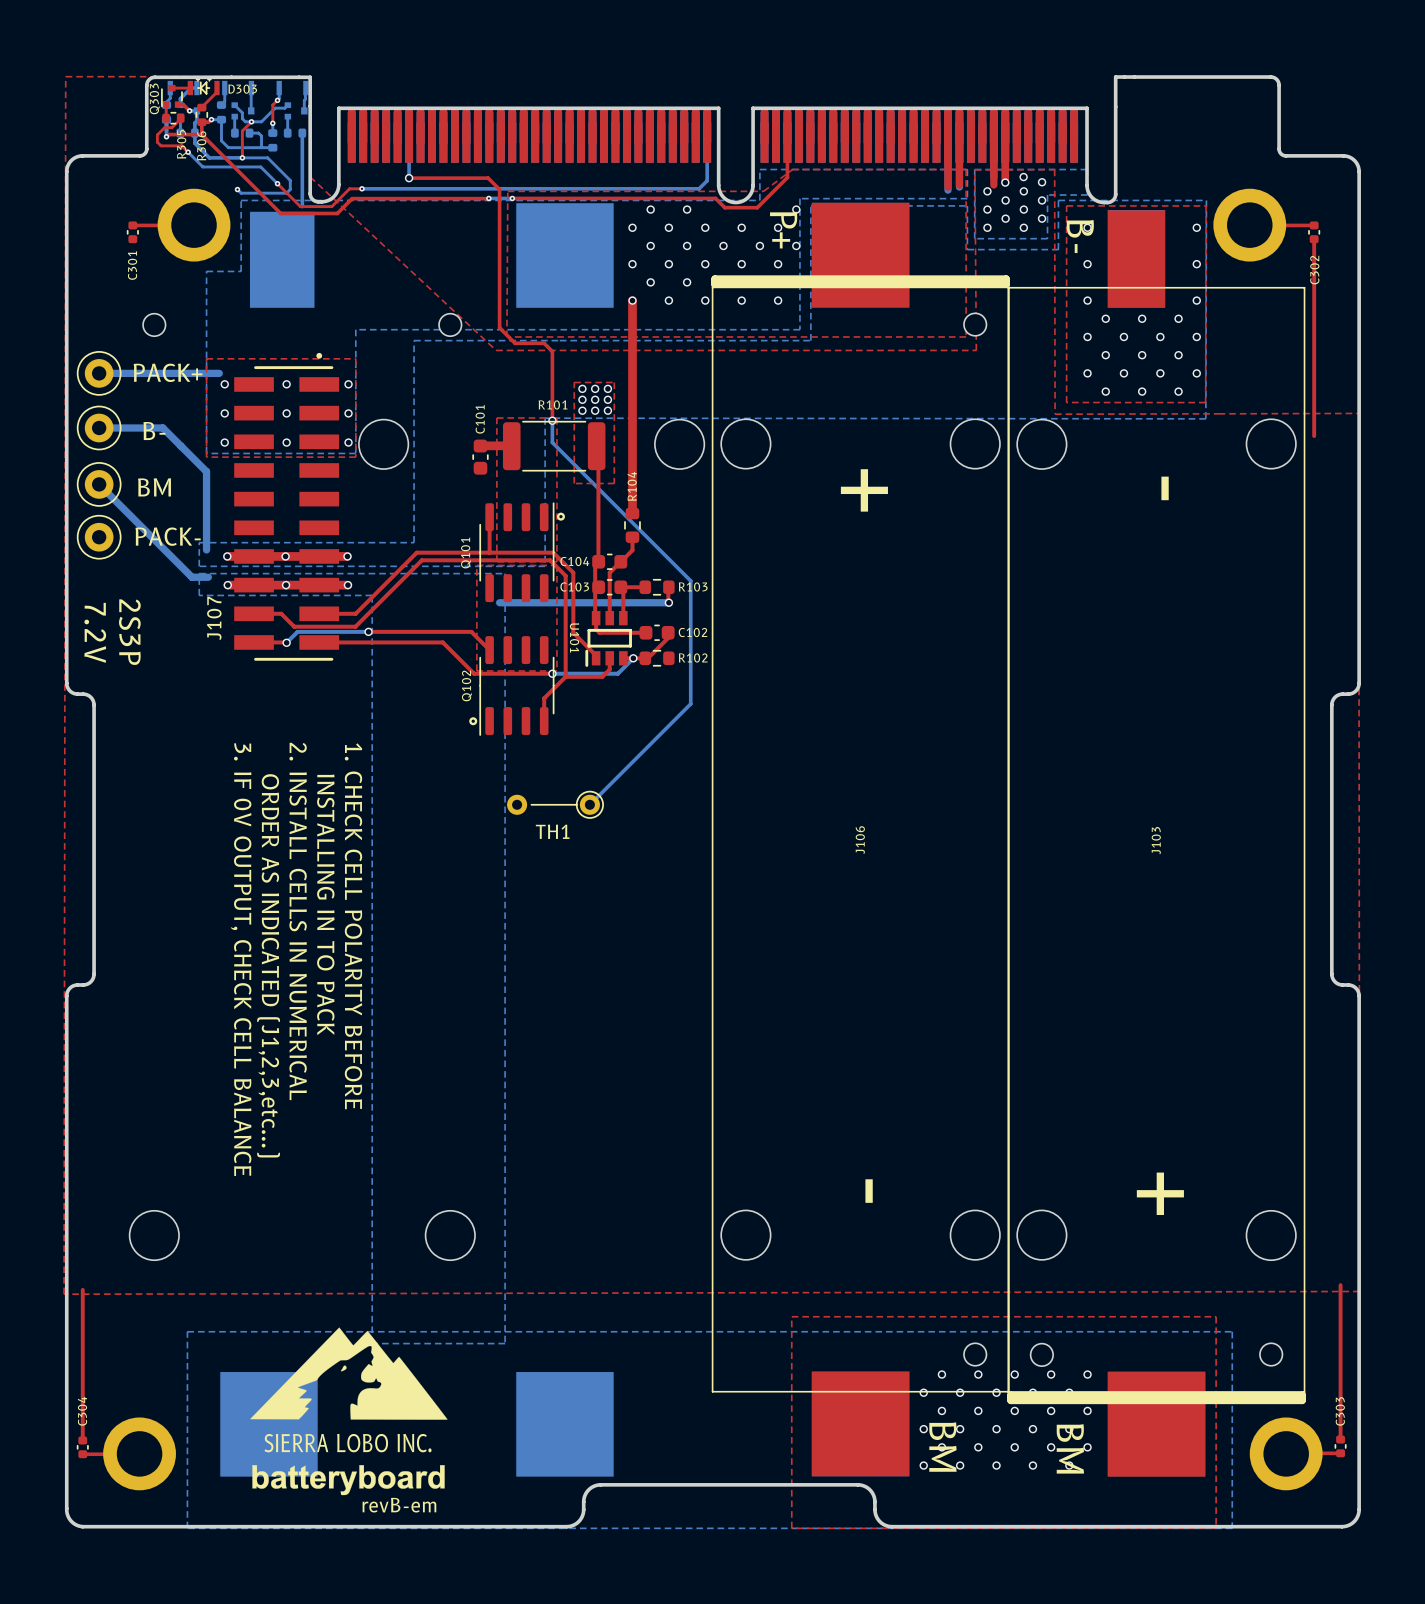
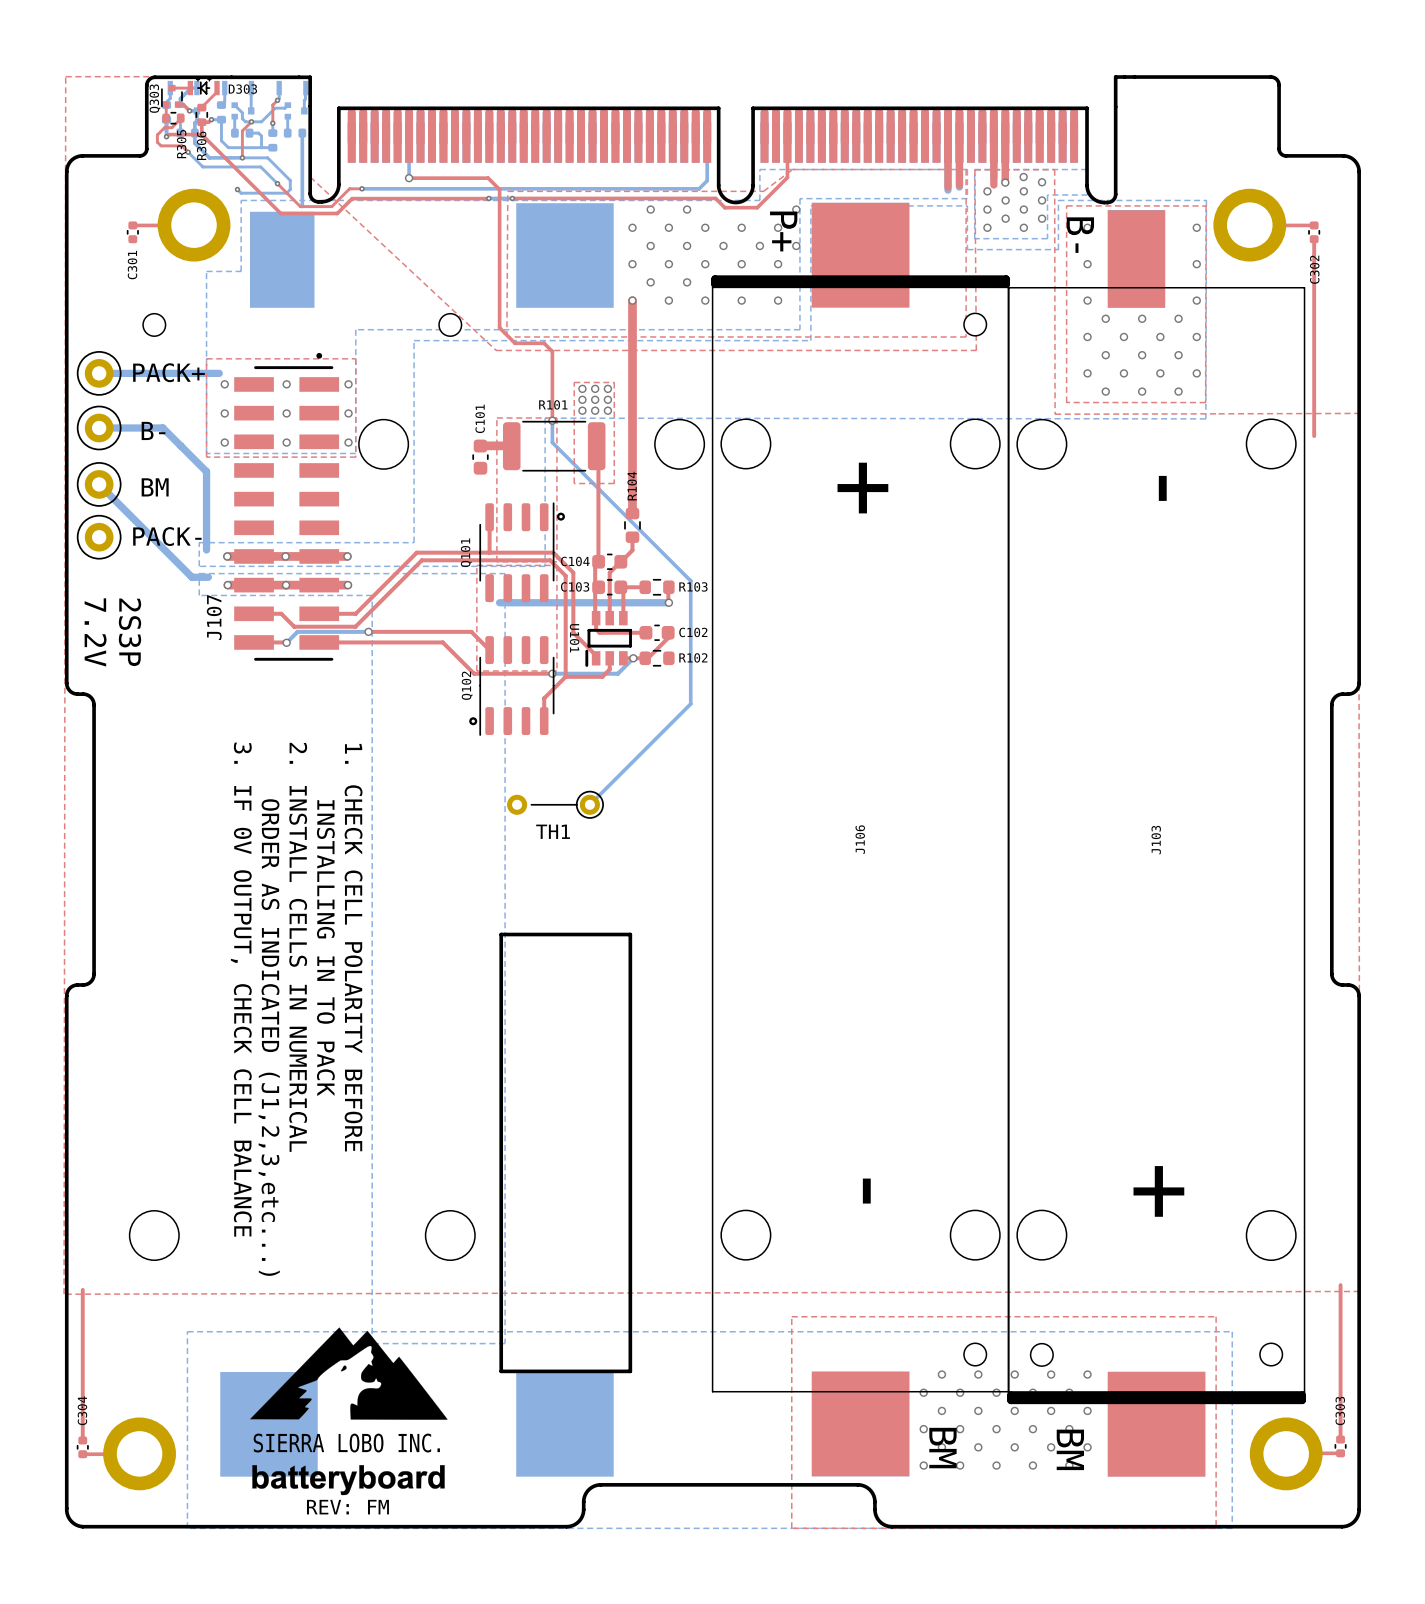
line: none -> (501, 934) (630, 934) (630, 1371) (501, 1371) (501, 934)
text: revB-em (399, 1505) -> none
text: none -> REV: FM (347, 1507)

